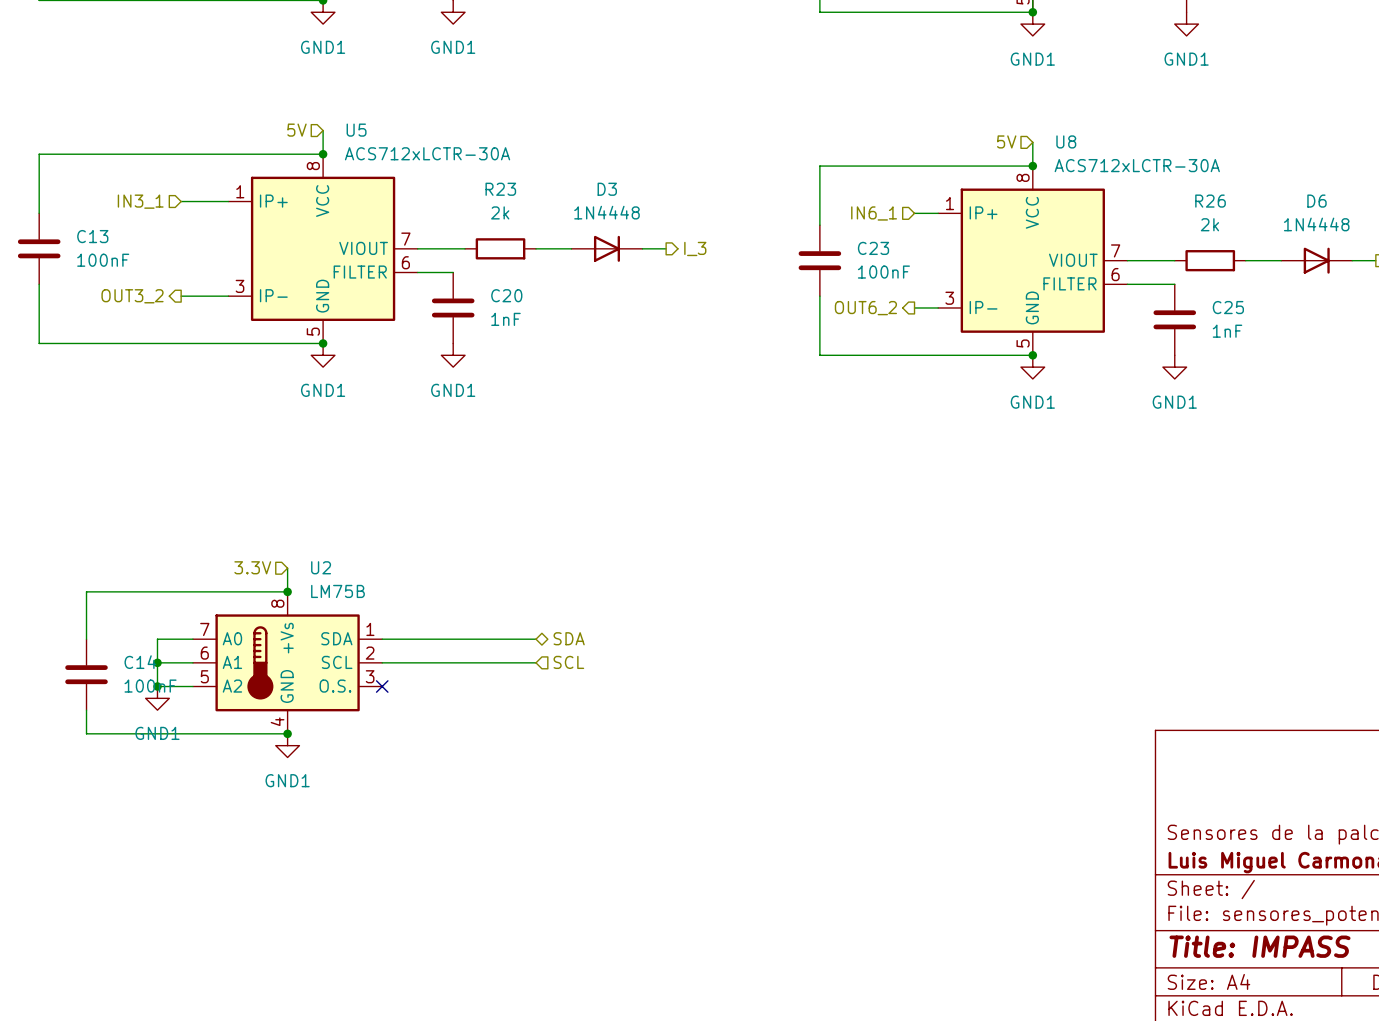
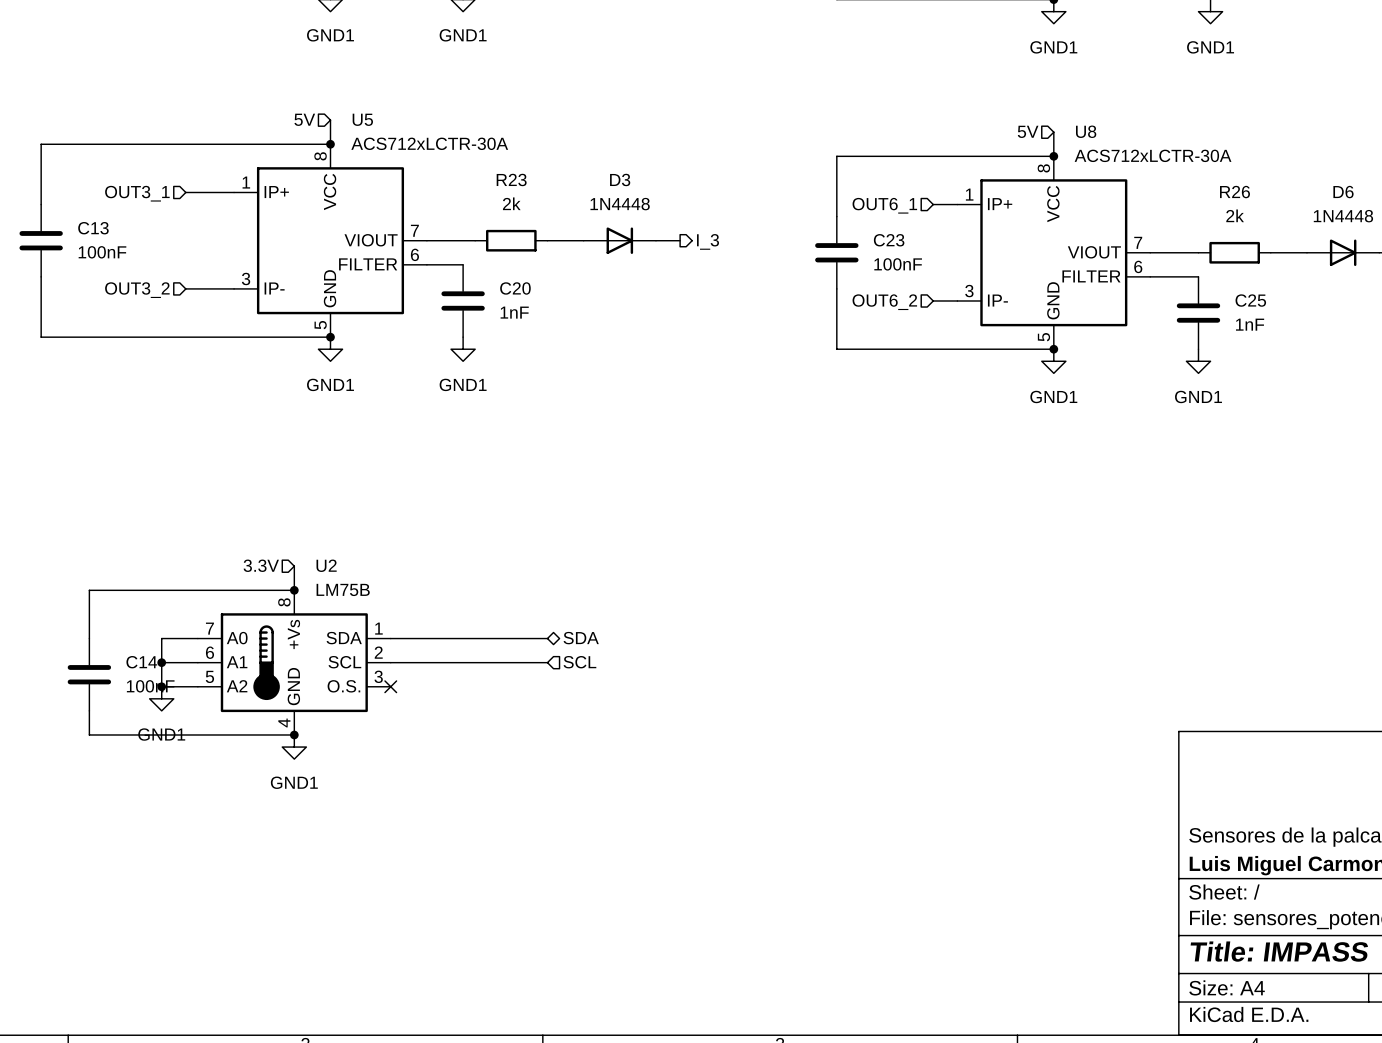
hierarchical label: IN3_1 (140, 201) -> OUT3_1 (137, 193)
hierarchical label: IN6_1 (874, 213) -> OUT6_1 (884, 205)
hierarchical label shape: output (132, 296) -> input (137, 290)
hierarchical label shape: output (865, 308) -> input (884, 302)

